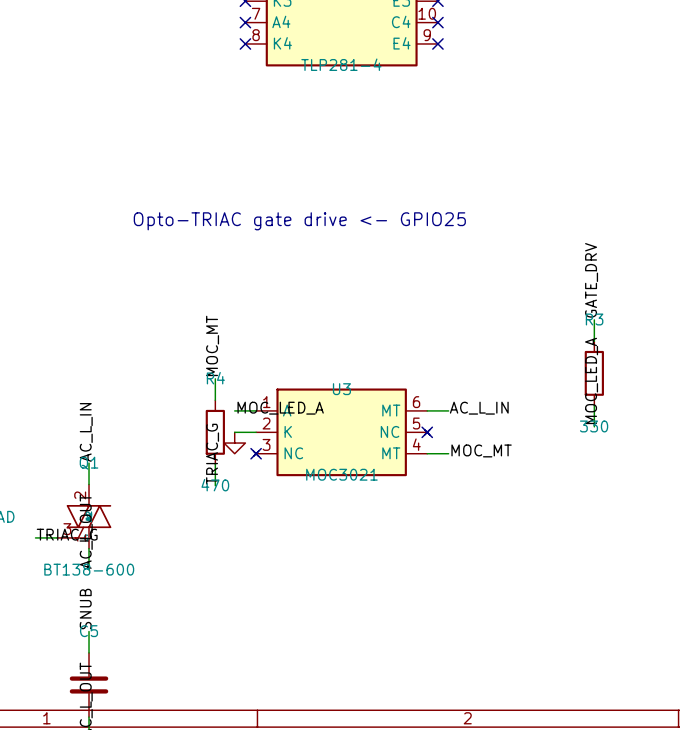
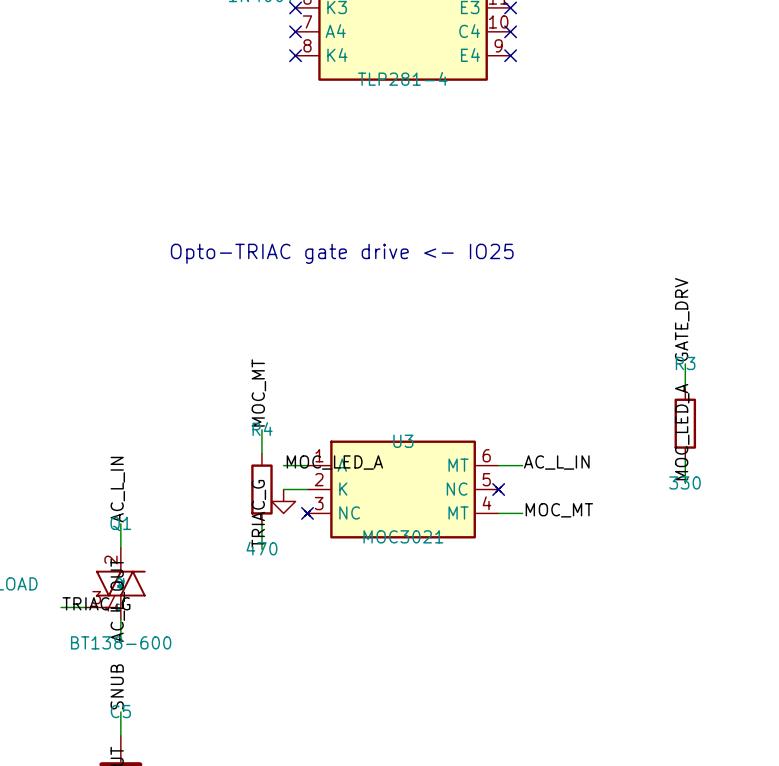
text: Opto-TRIAC gate drive <- GPIO25 (299, 221) -> Opto-TRIAC gate drive <- IO25 (342, 253)

